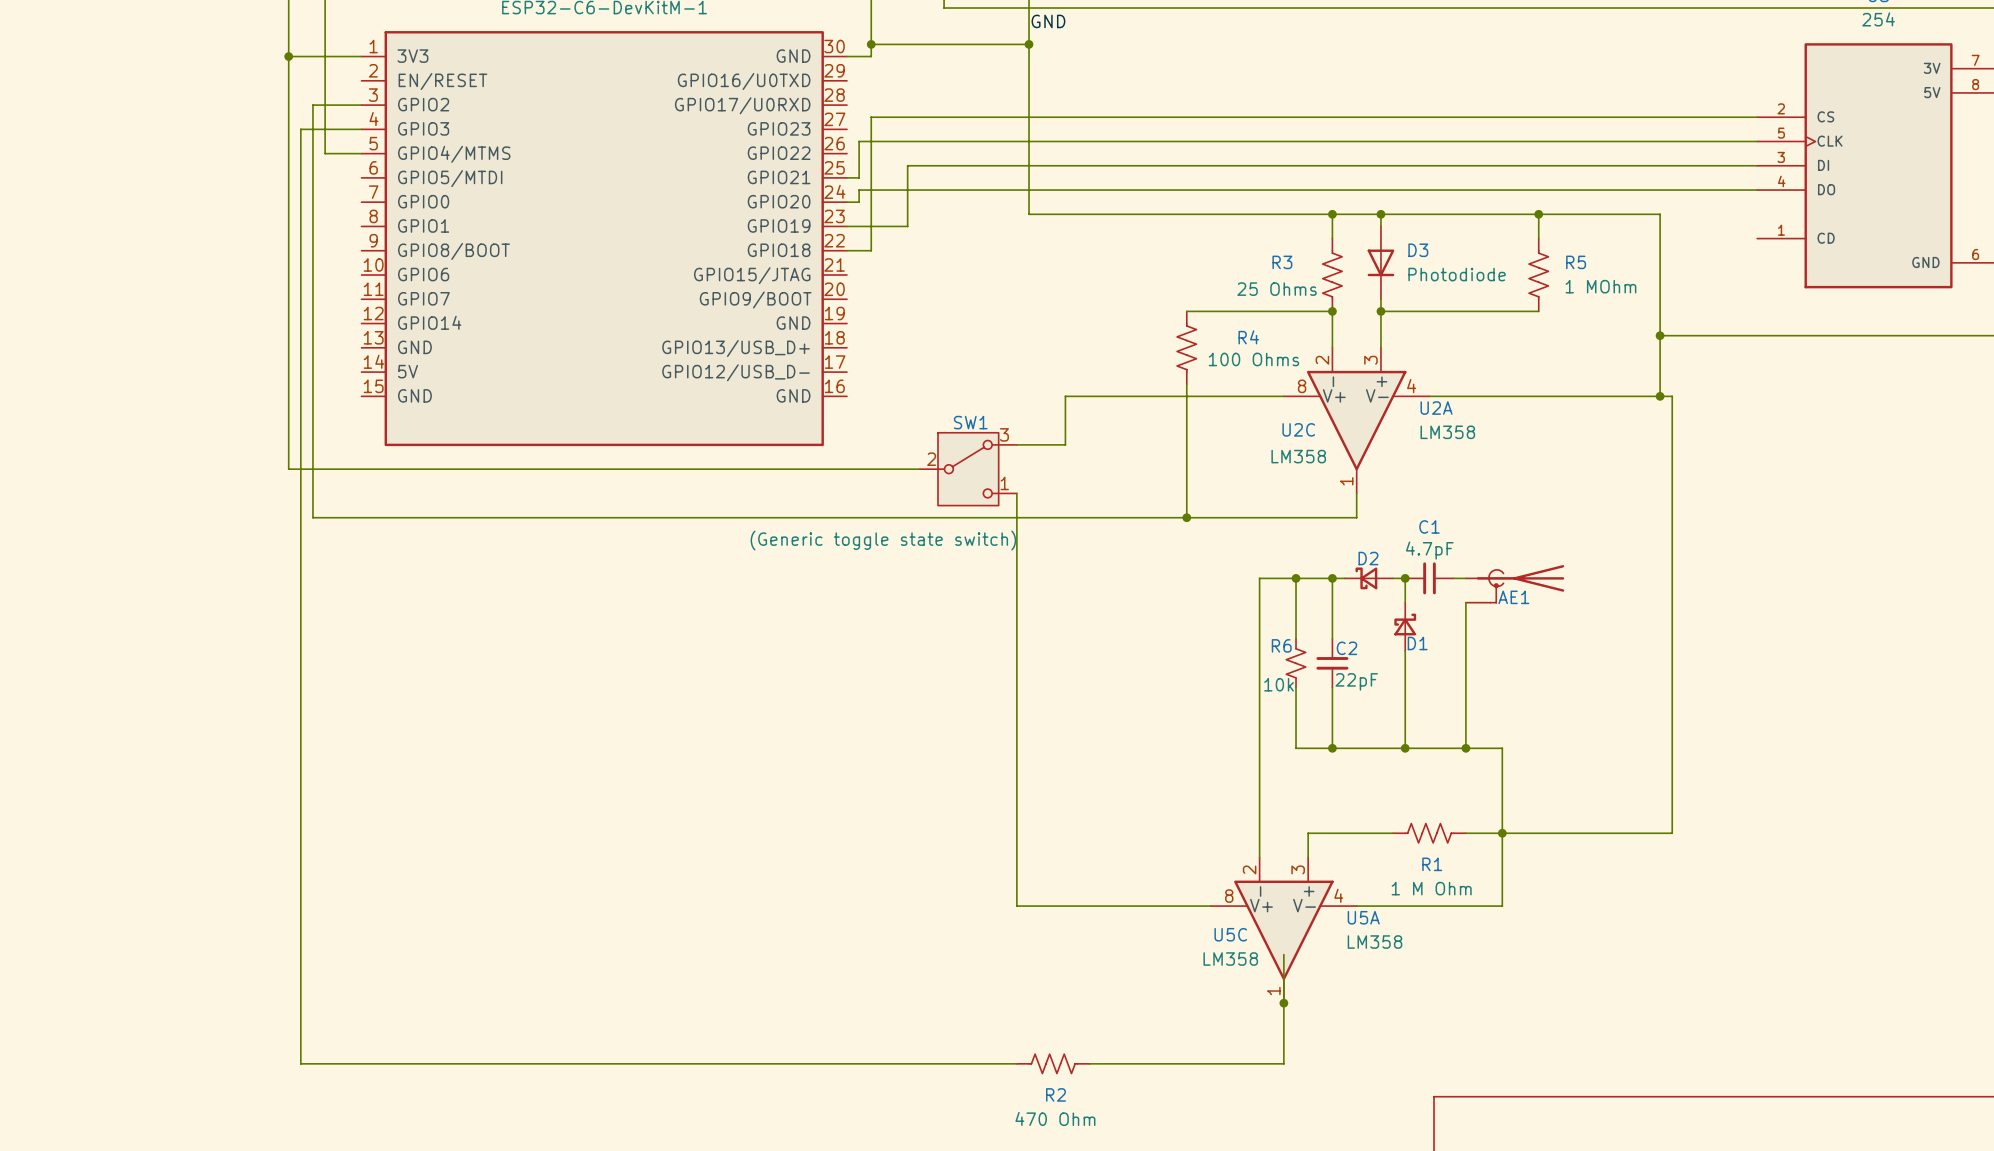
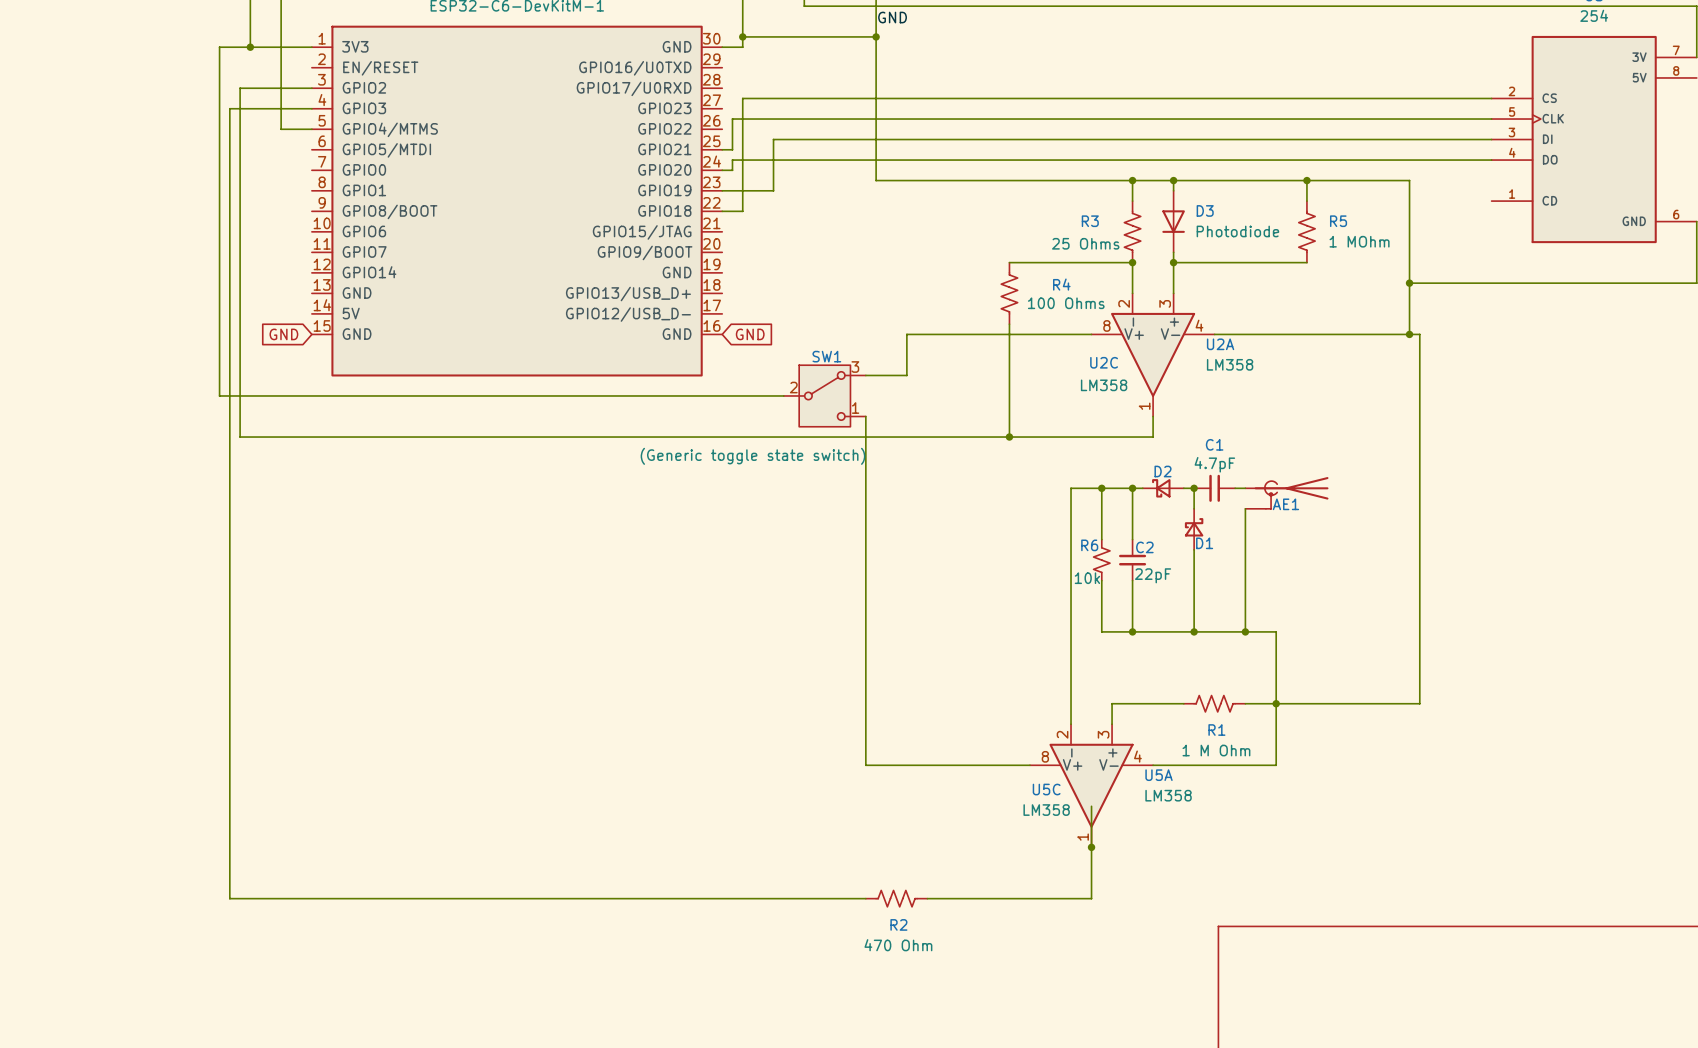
wire: (288, 56) (288, 469) -> (250, 47) (219, 47) (219, 395) (250, 395)
wire: (312, 105) (312, 517) -> (270, 88) (240, 88) (240, 437) (270, 437)
wire: (300, 129) (300, 1063) -> (260, 108) (229, 108) (229, 898) (260, 898)
global label: none -> GND (283, 334)
global label: none -> GND (750, 334)

